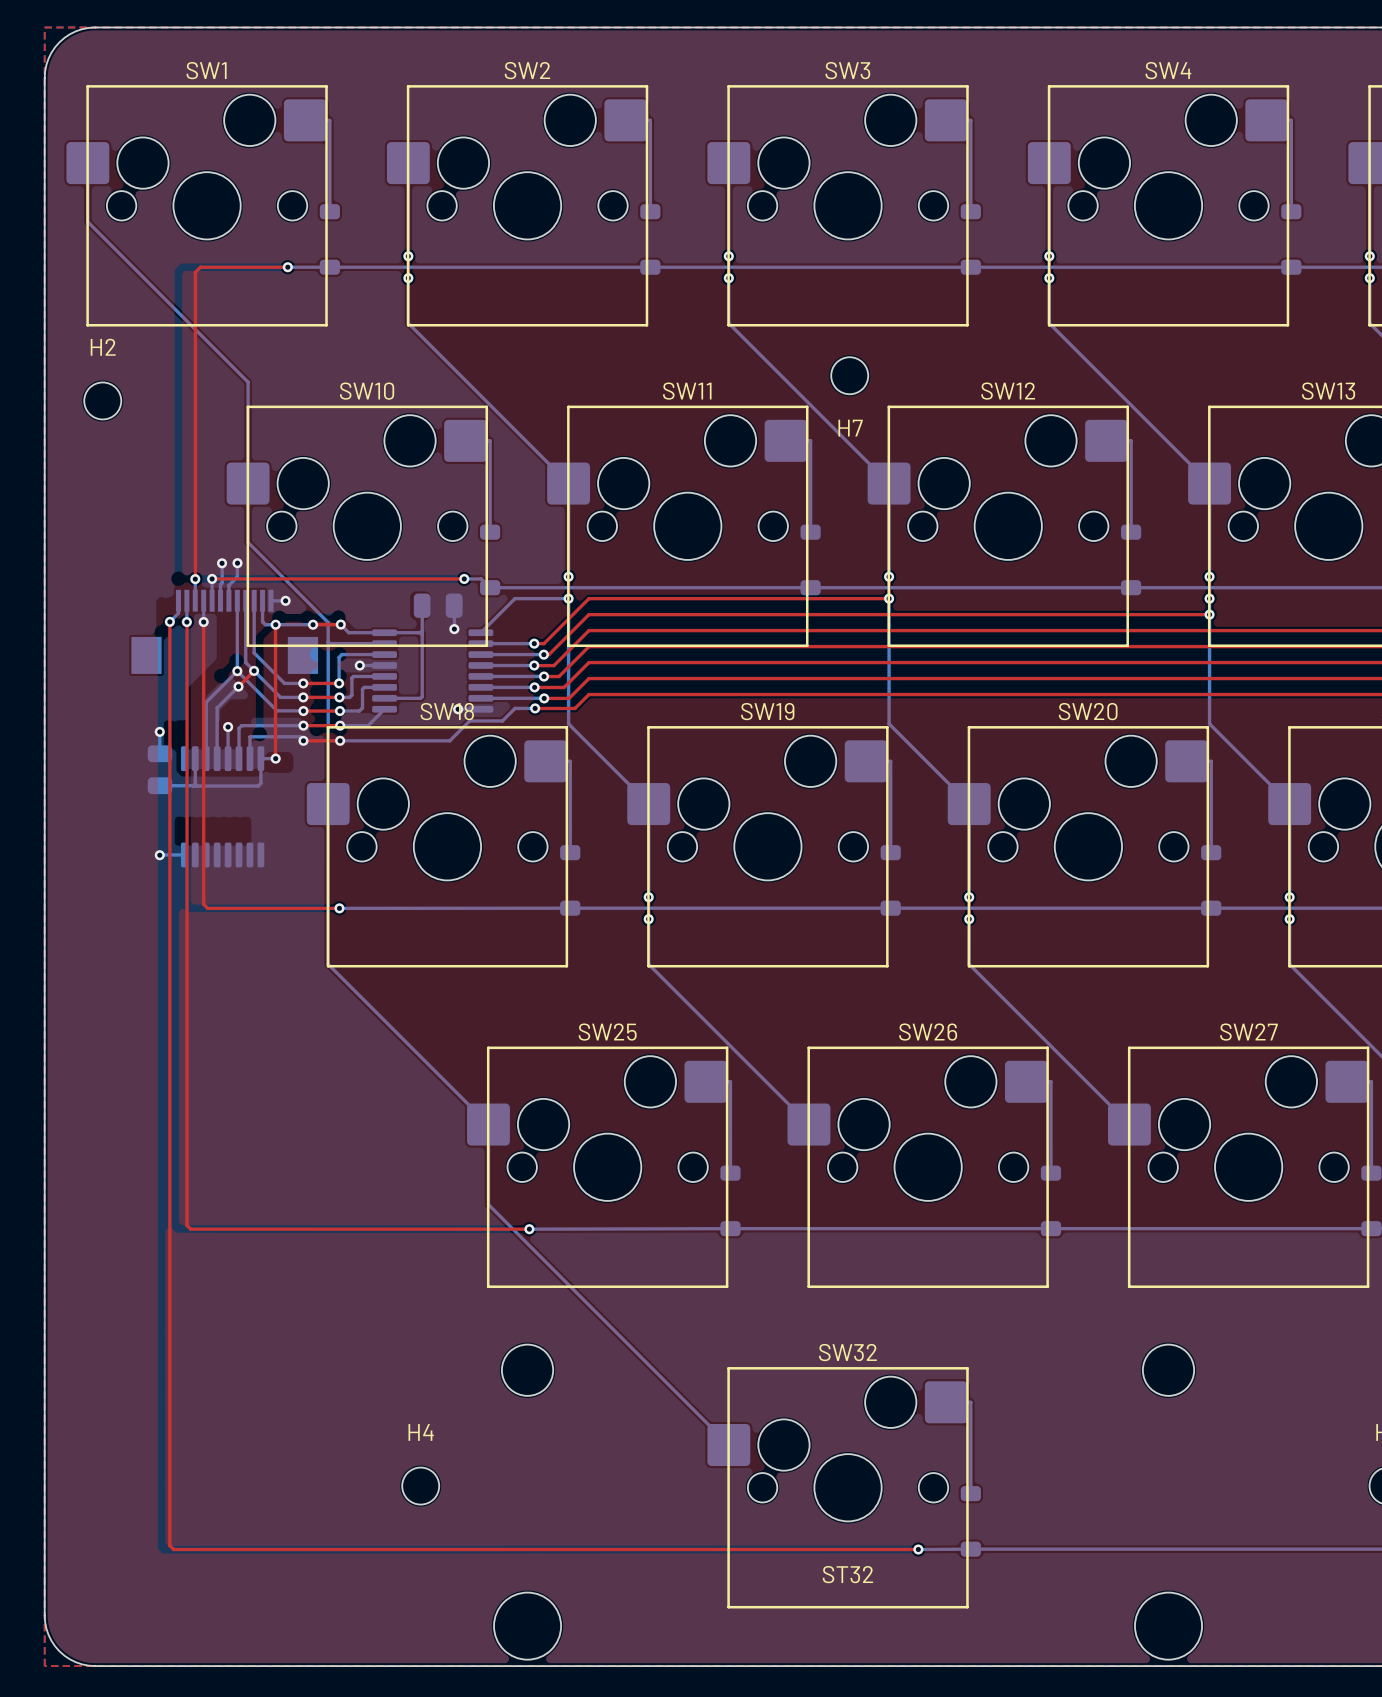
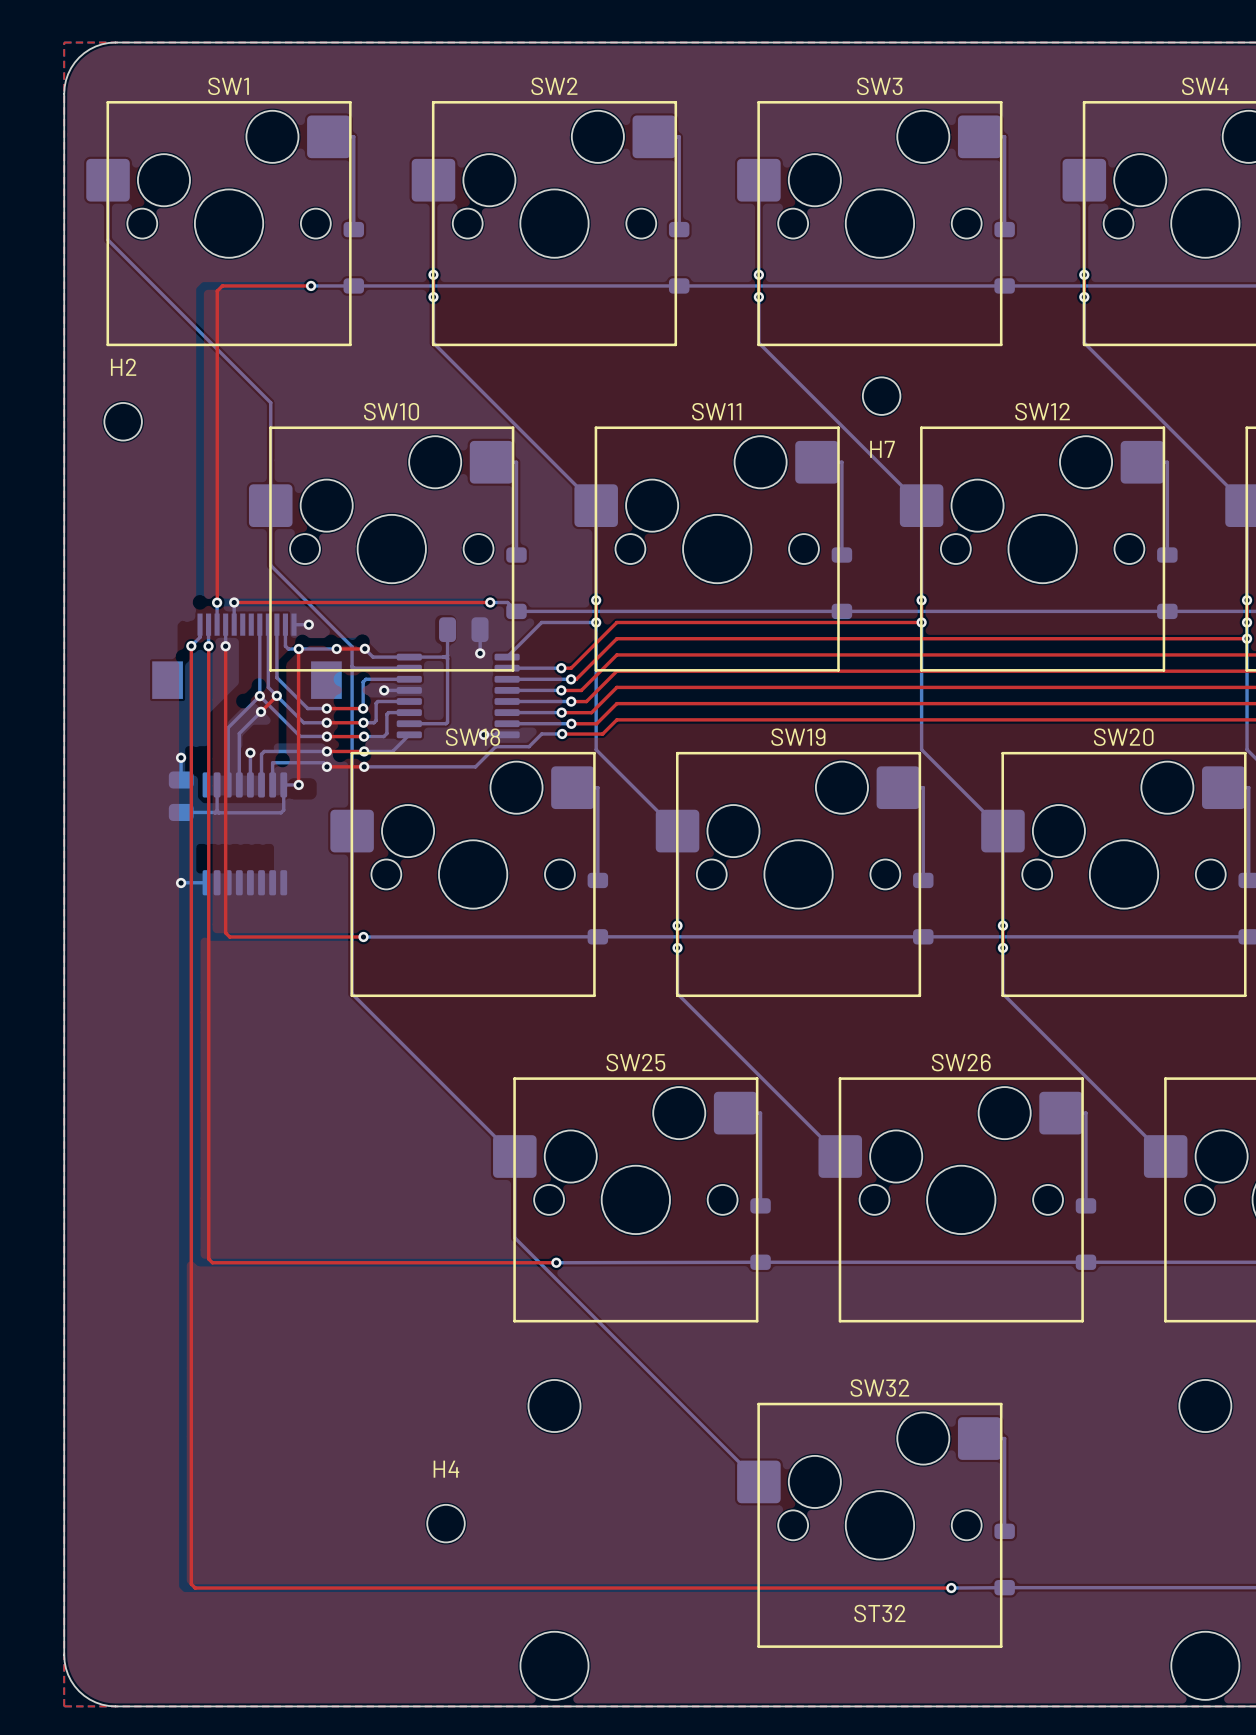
bottom track: (222, 563) (220, 600) -> none
via: (222, 563) -> none
bottom track: (237, 563) (237, 576) (228, 585) (228, 600) -> none
via: (237, 563) -> none

